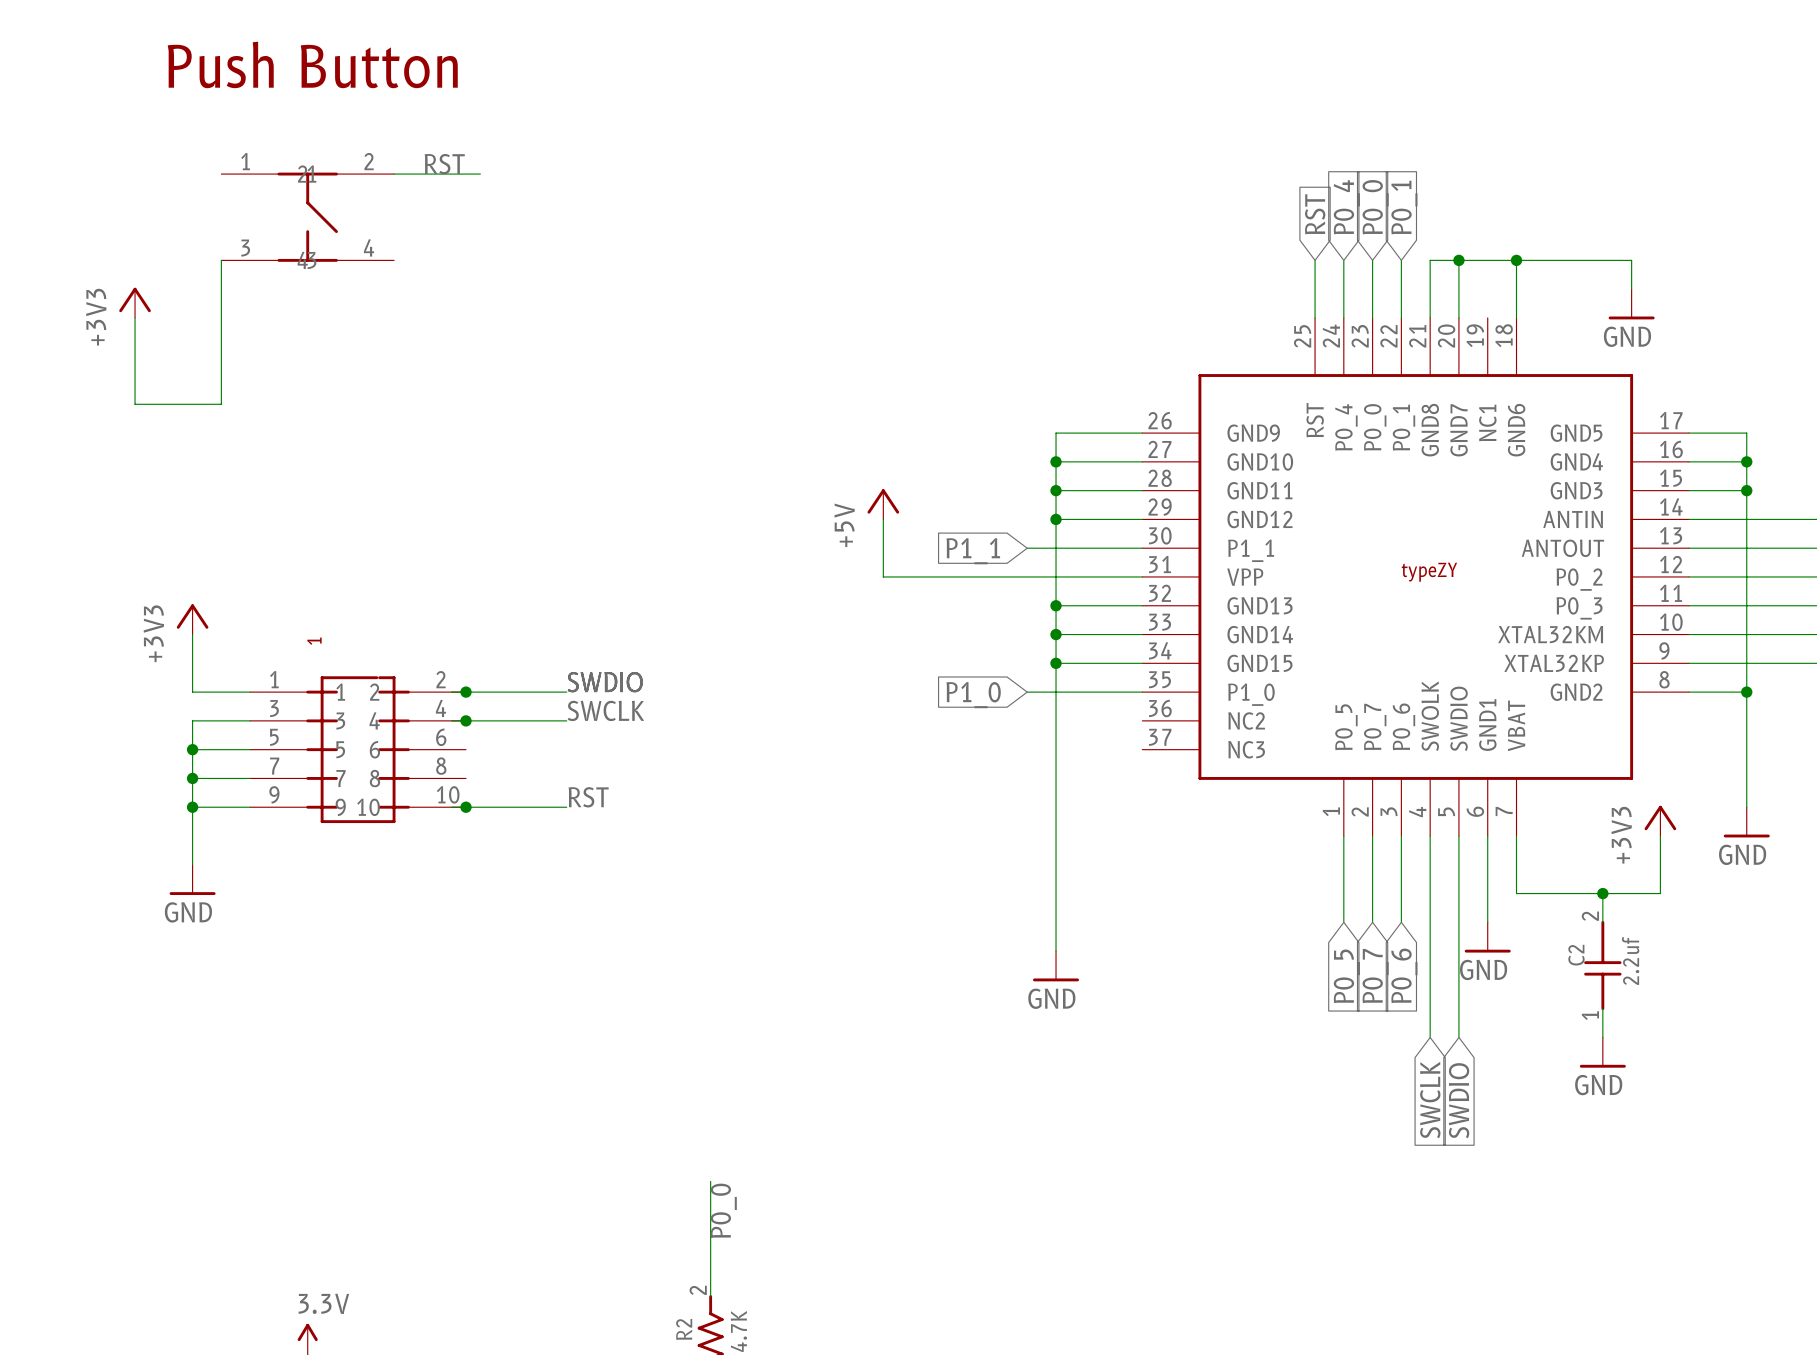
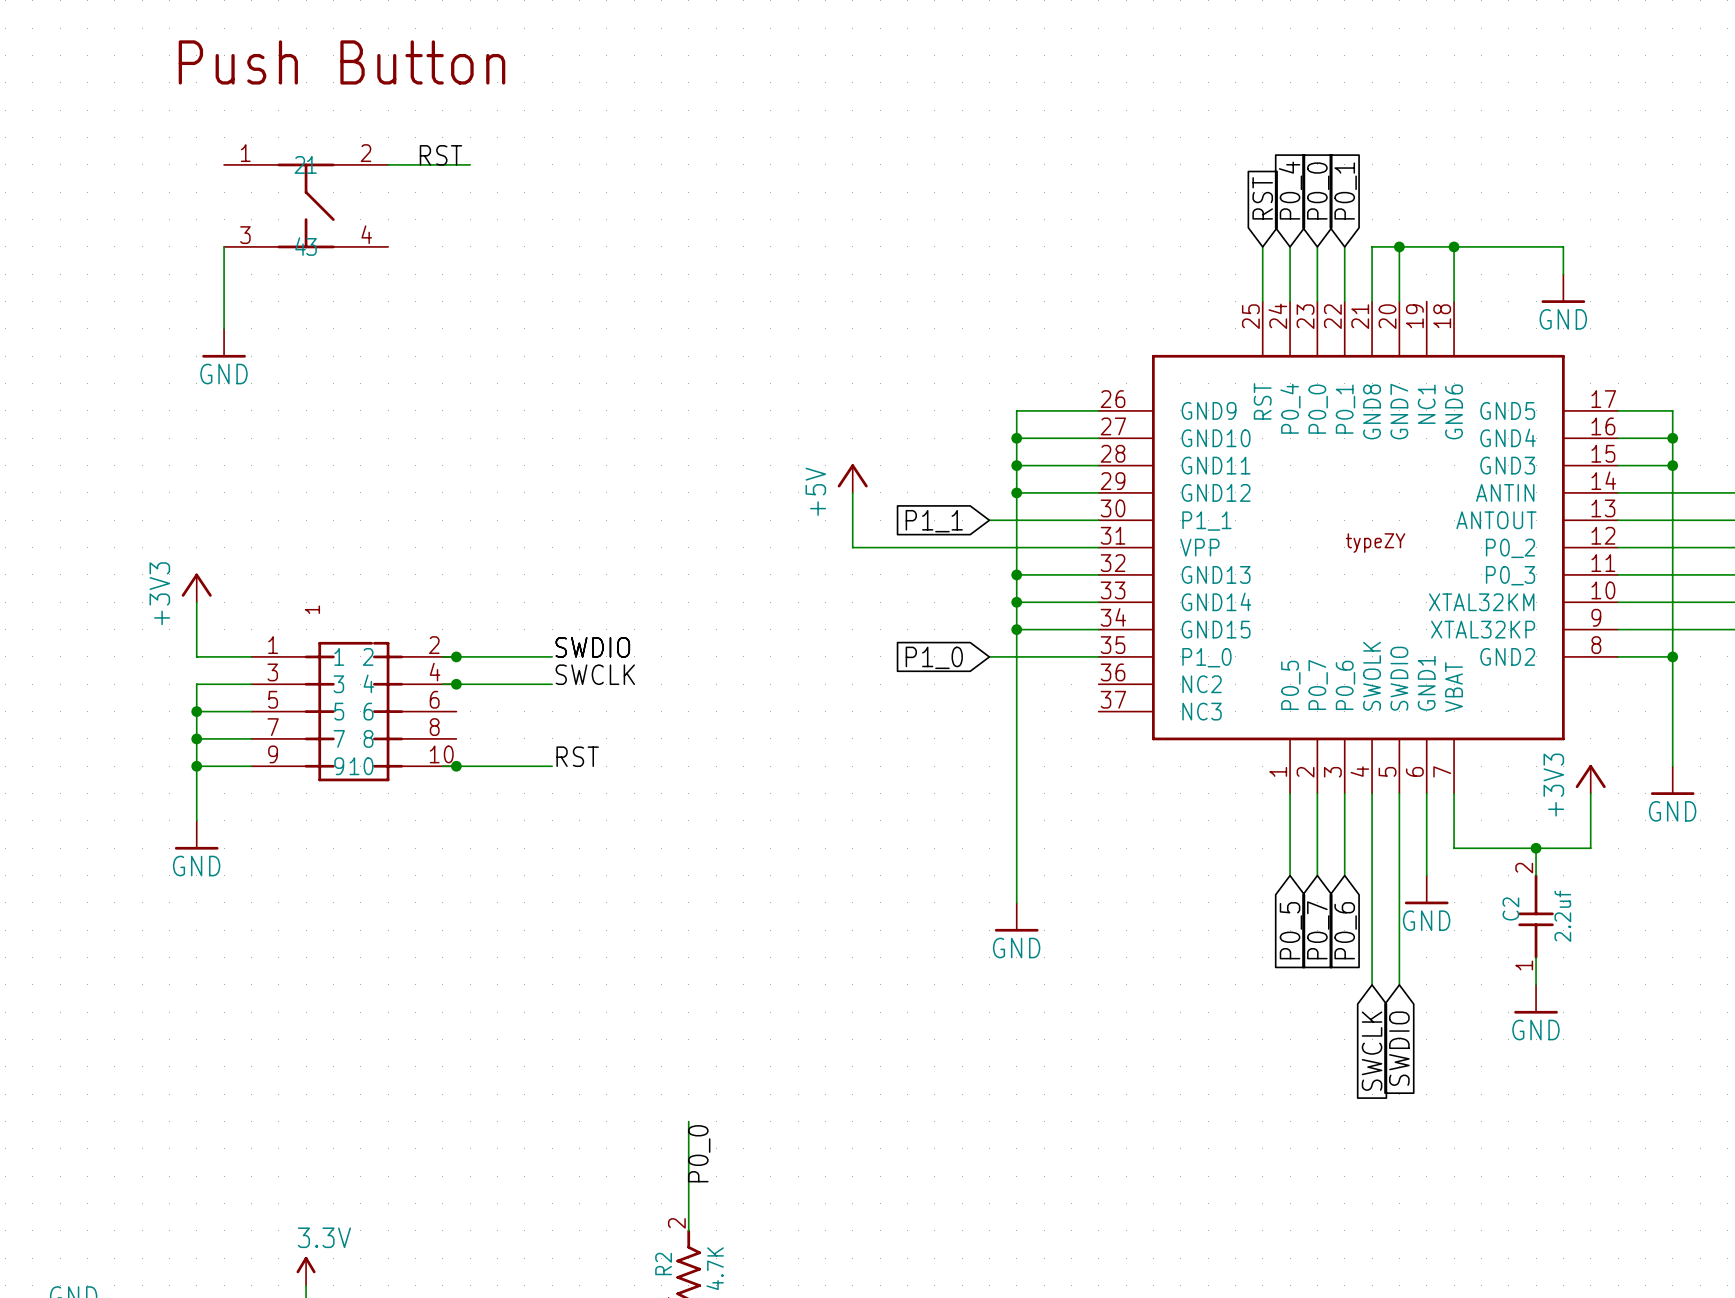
power symbol: +3V3 (135, 302) -> none
wire: (135, 317) (135, 404) (221, 404) (221, 346) -> none
power symbol: none -> GND (224, 343)

